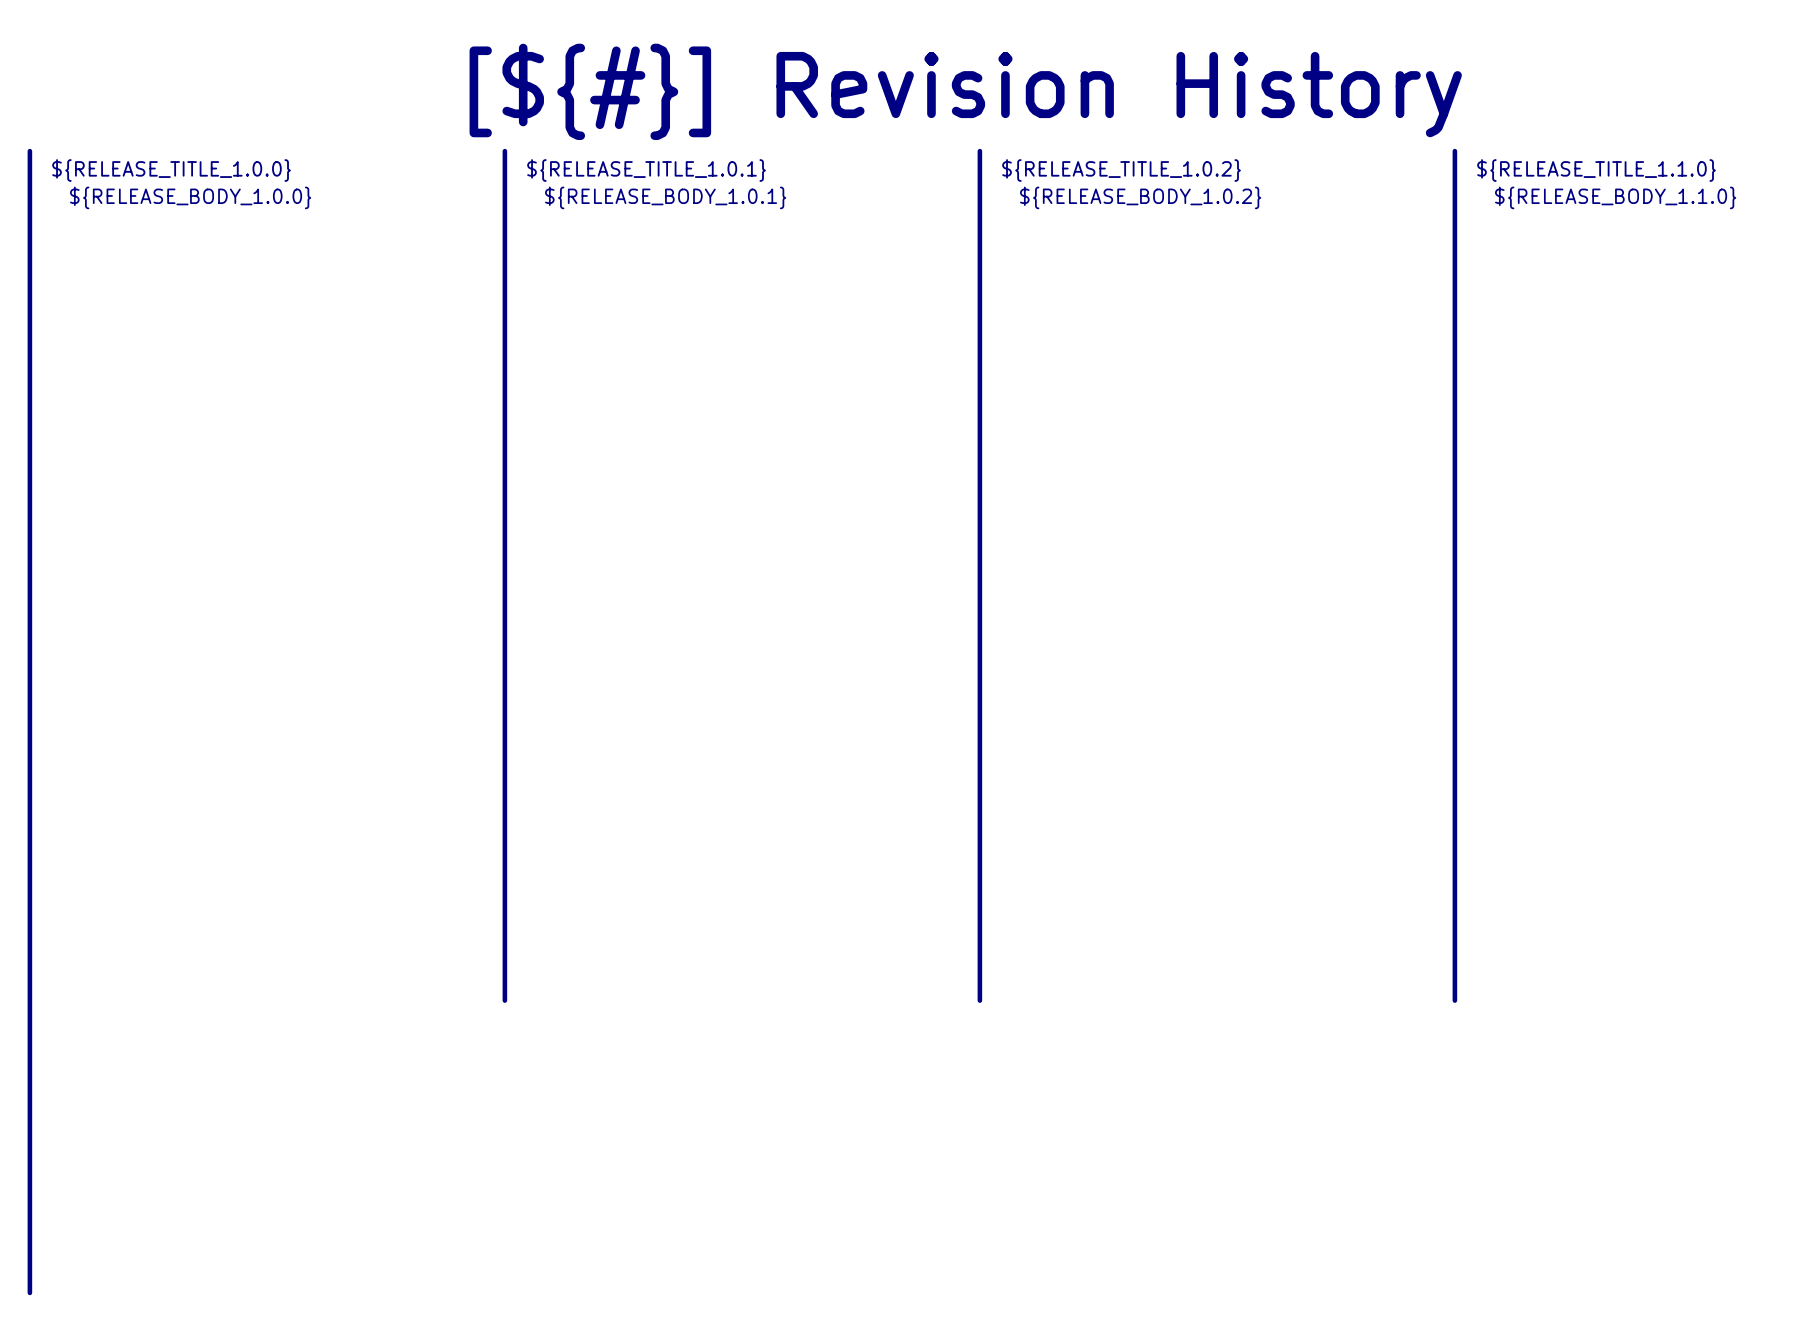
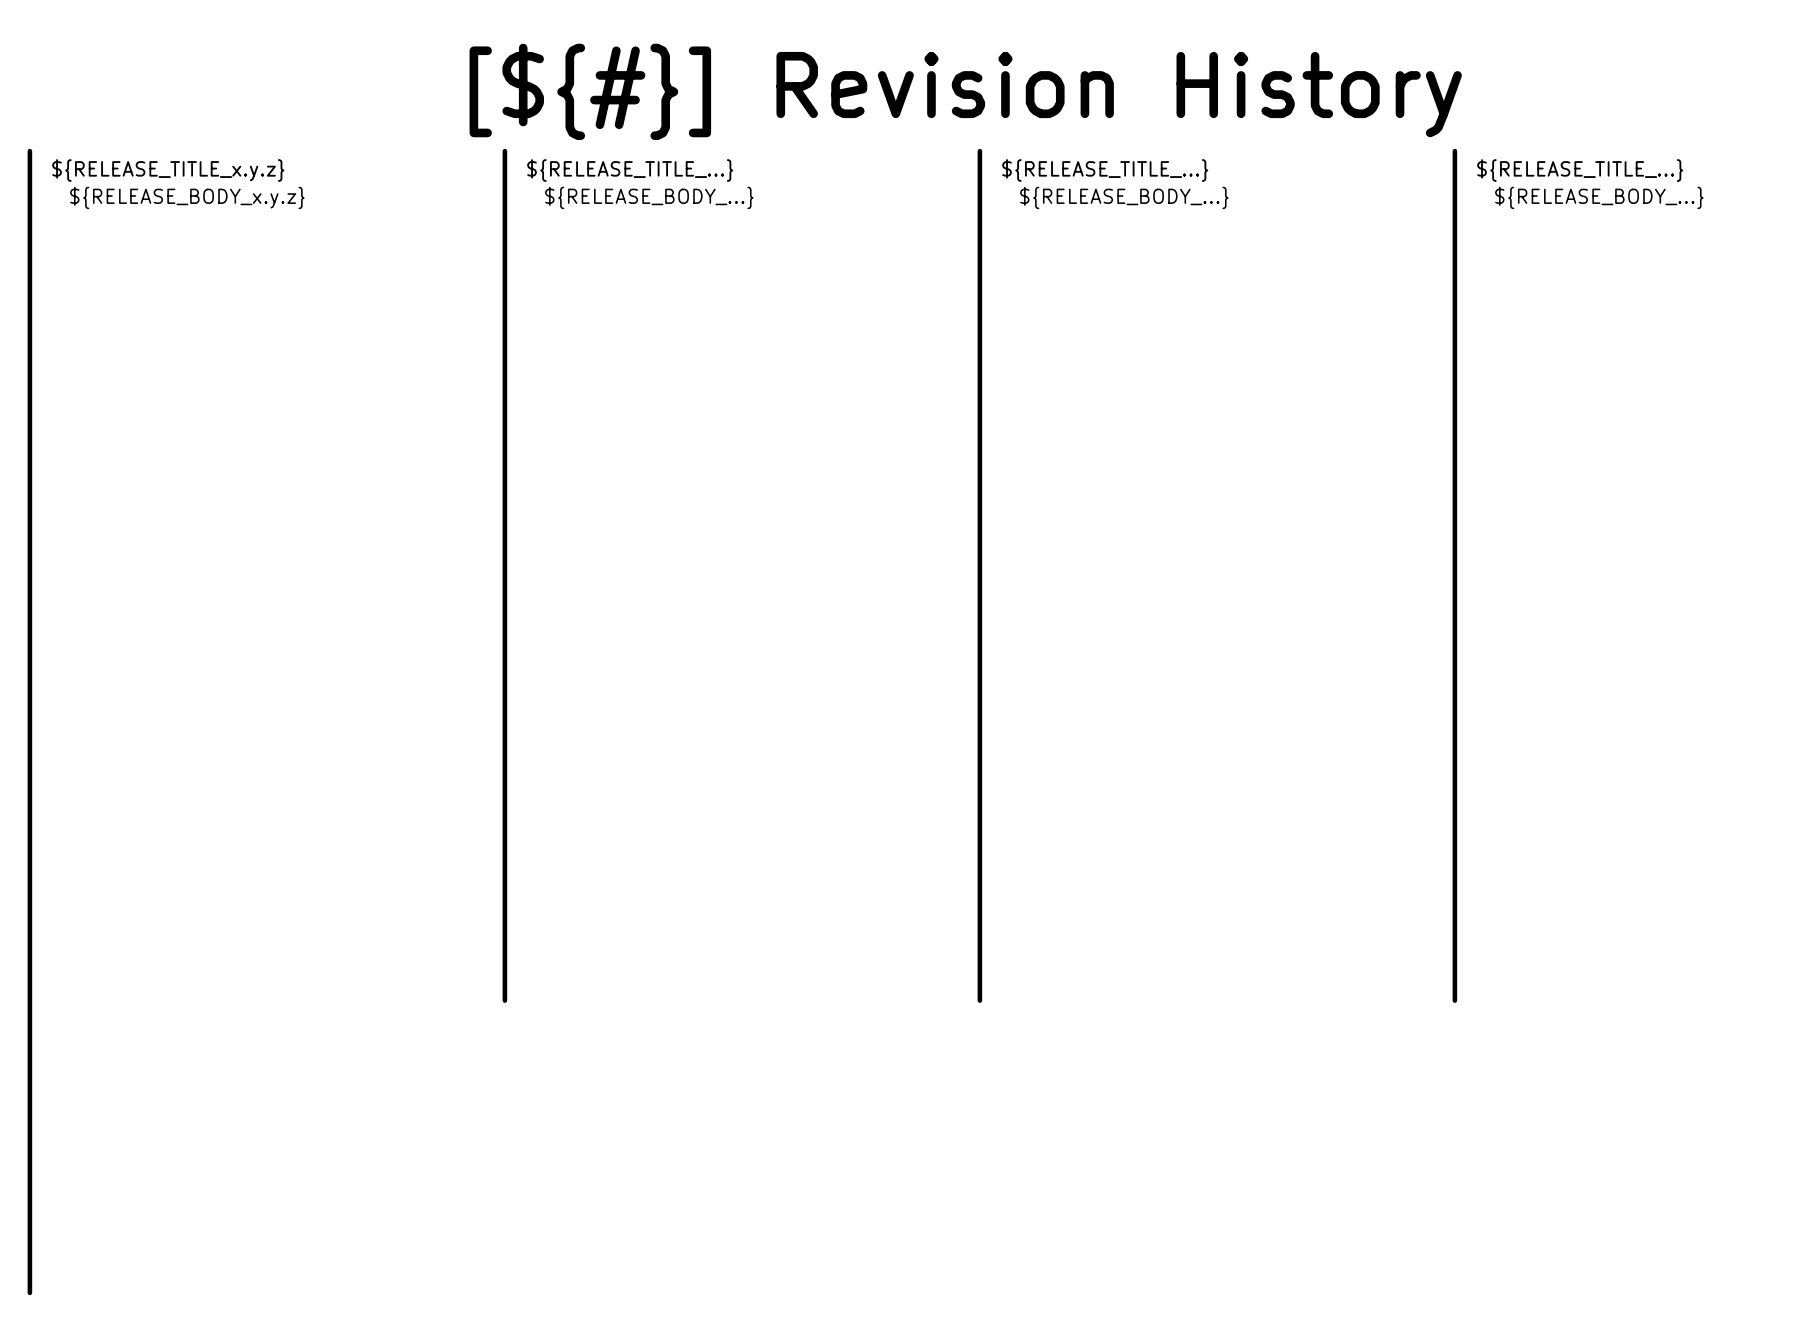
text: ${RELEASE_TITLE_1.0.0} (171, 170) -> ${RELEASE_TITLE_x.y.z} (168, 170)
text: ${RELEASE_TITLE_1.0.1} (646, 170) -> ${RELEASE_TITLE_...} (630, 170)
text: ${RELEASE_TITLE_1.0.2} (1121, 170) -> ${RELEASE_TITLE_...} (1105, 170)
text: ${RELEASE_TITLE_1.1.0} (1596, 170) -> ${RELEASE_TITLE_...} (1580, 170)
text: ${RELEASE_BODY_1.0.0} (190, 197) -> ${RELEASE_BODY_x.y.z} (187, 197)
text: ${RELEASE_BODY_1.0.1} (665, 197) -> ${RELEASE_BODY_...} (649, 197)
text: ${RELEASE_BODY_1.0.2} (1140, 197) -> ${RELEASE_BODY_...} (1124, 197)
text: ${RELEASE_BODY_1.1.0} (1615, 197) -> ${RELEASE_BODY_...} (1599, 197)

